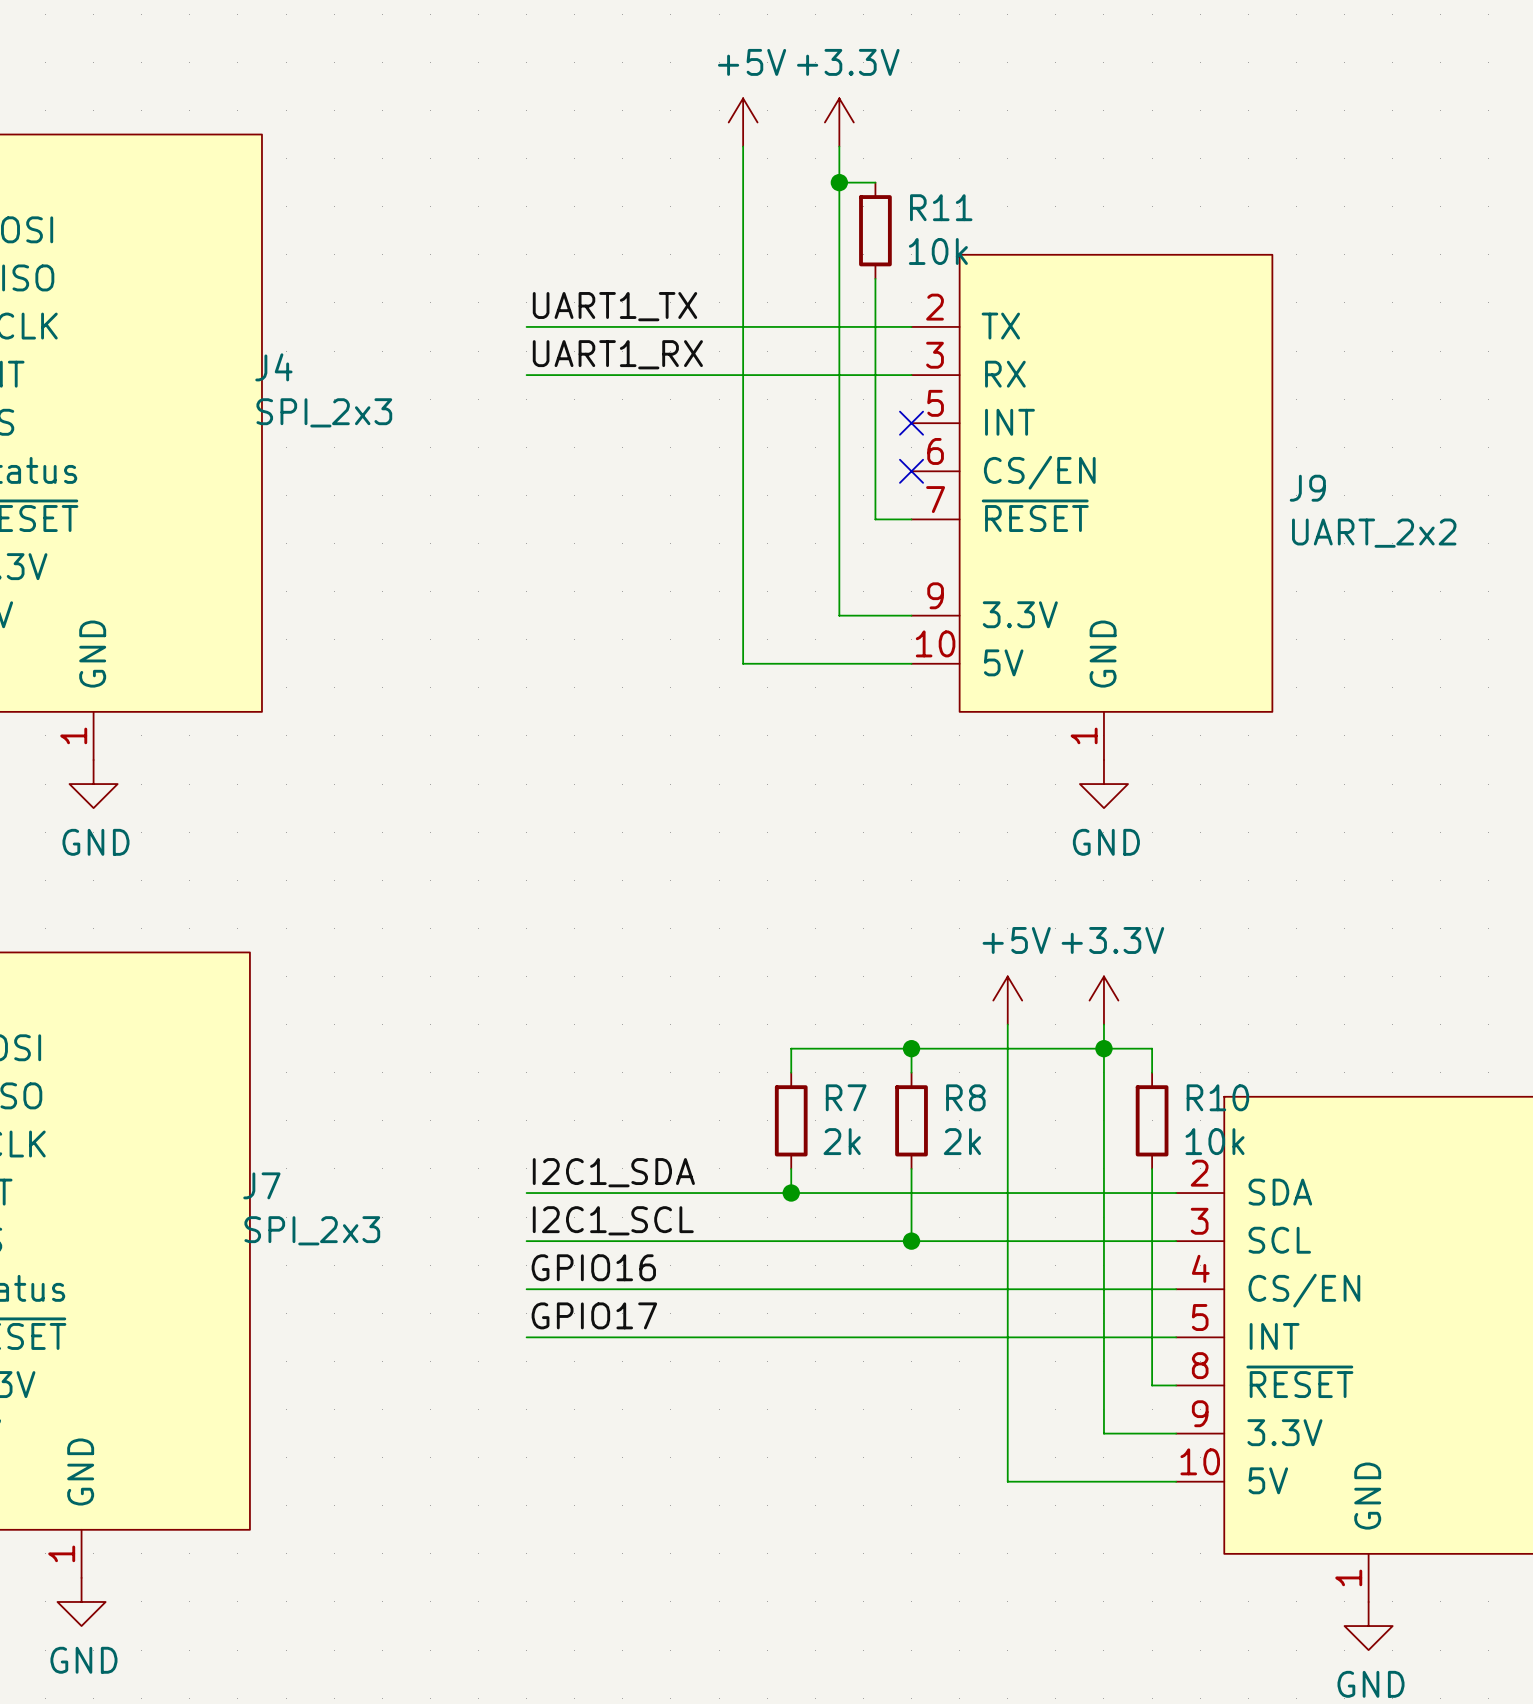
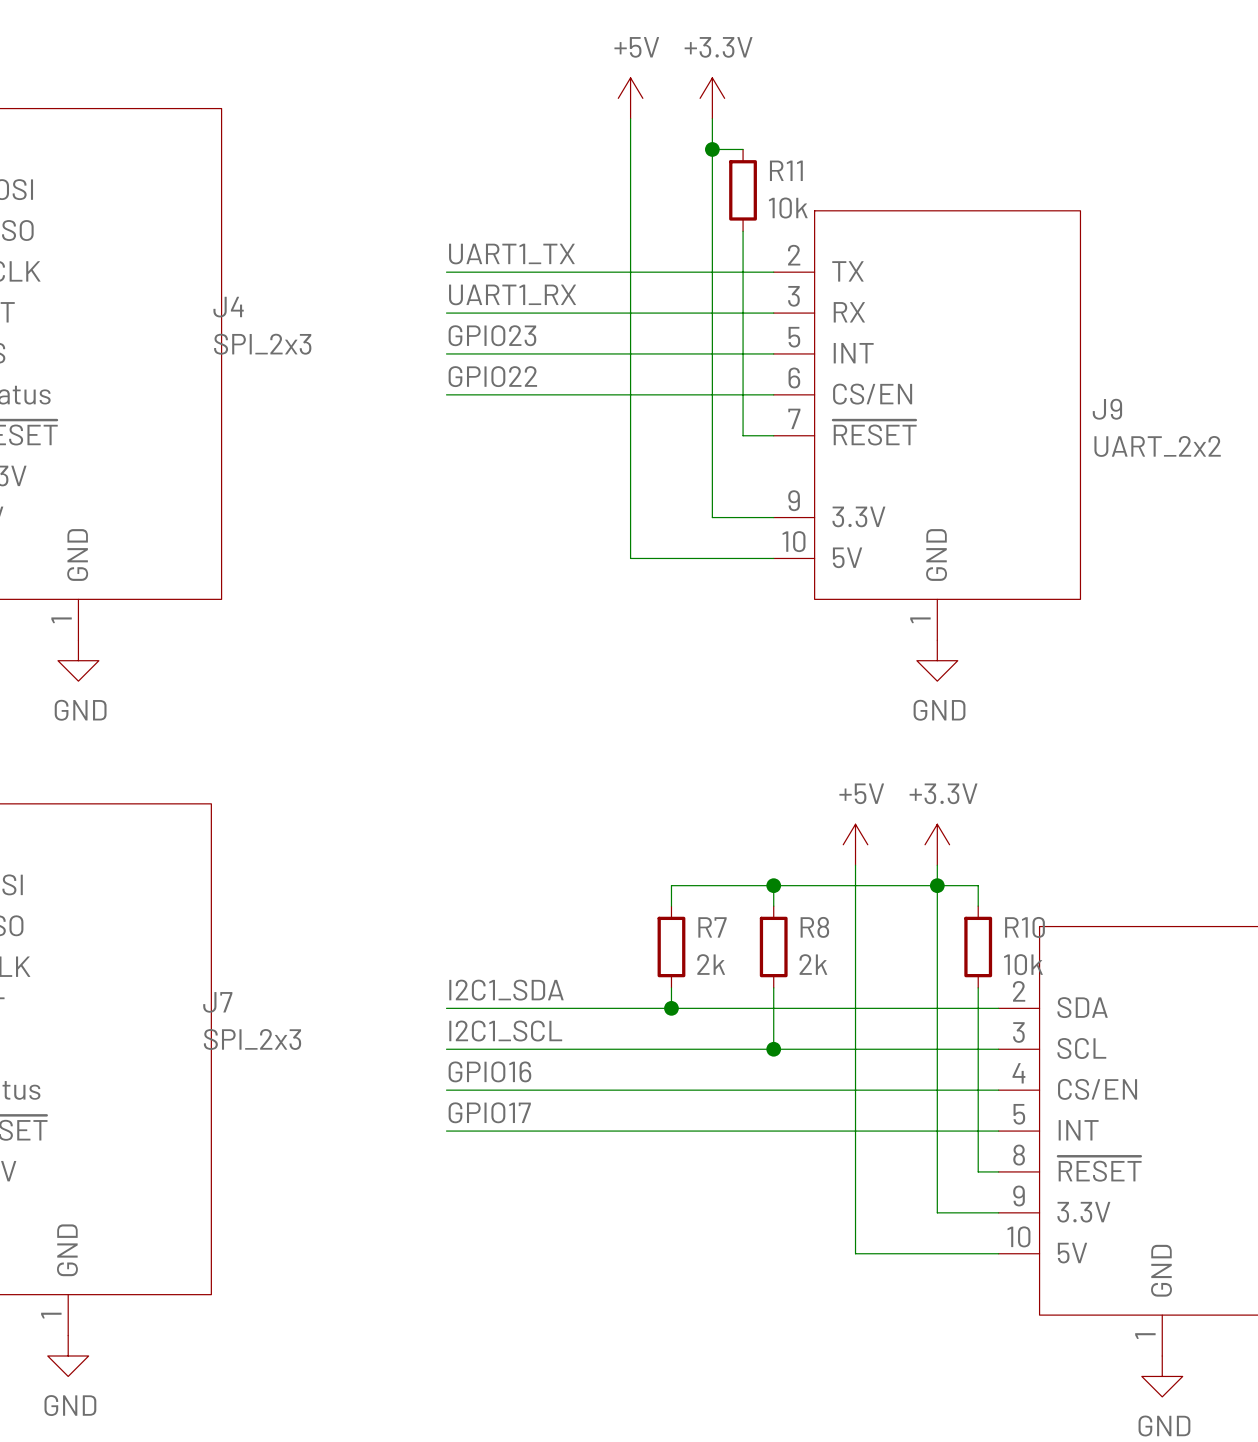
label: none -> GPIO23 (492, 335)
wire: none -> (446, 353) (773, 353)
no-connect mark: (911, 423) -> none
label: none -> GPIO22 (492, 376)
wire: none -> (446, 394) (773, 394)
no-connect mark: (911, 471) -> none

